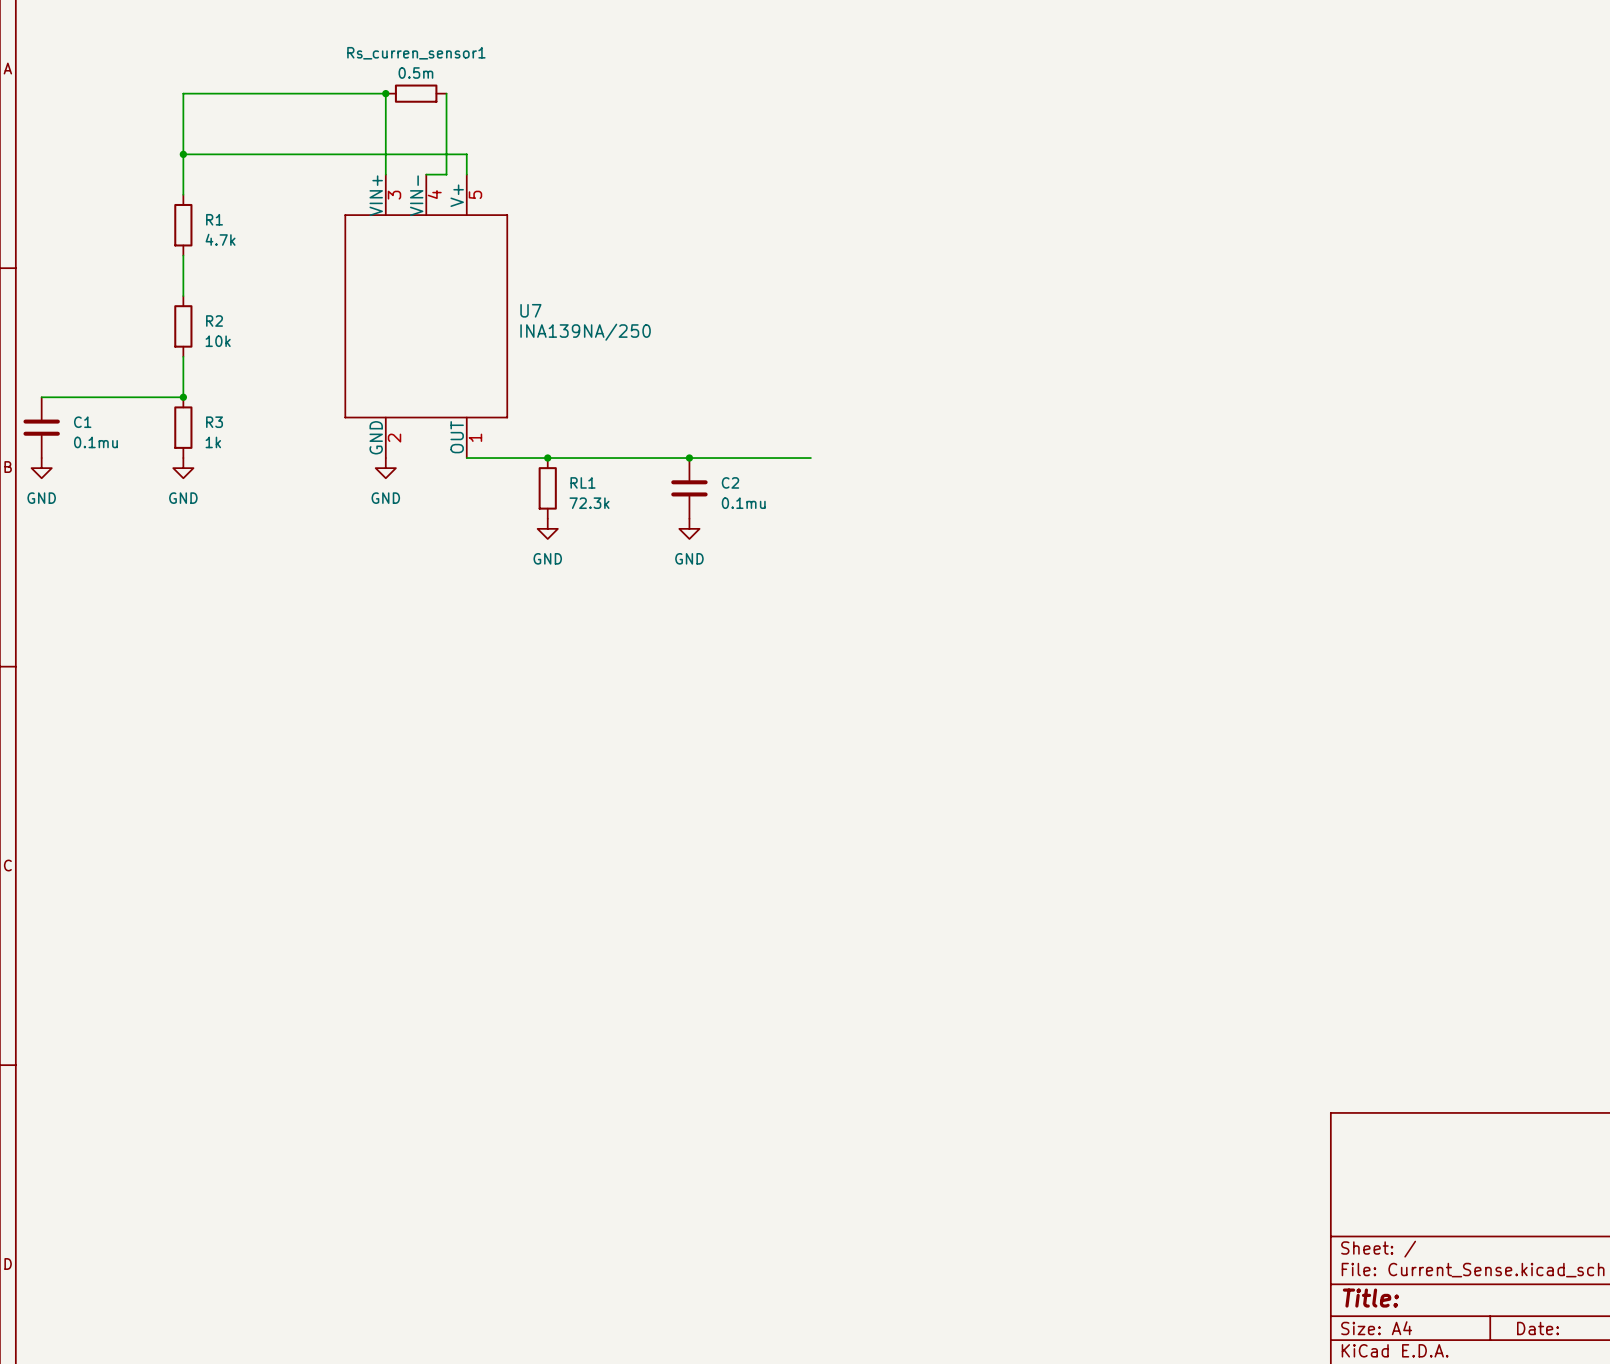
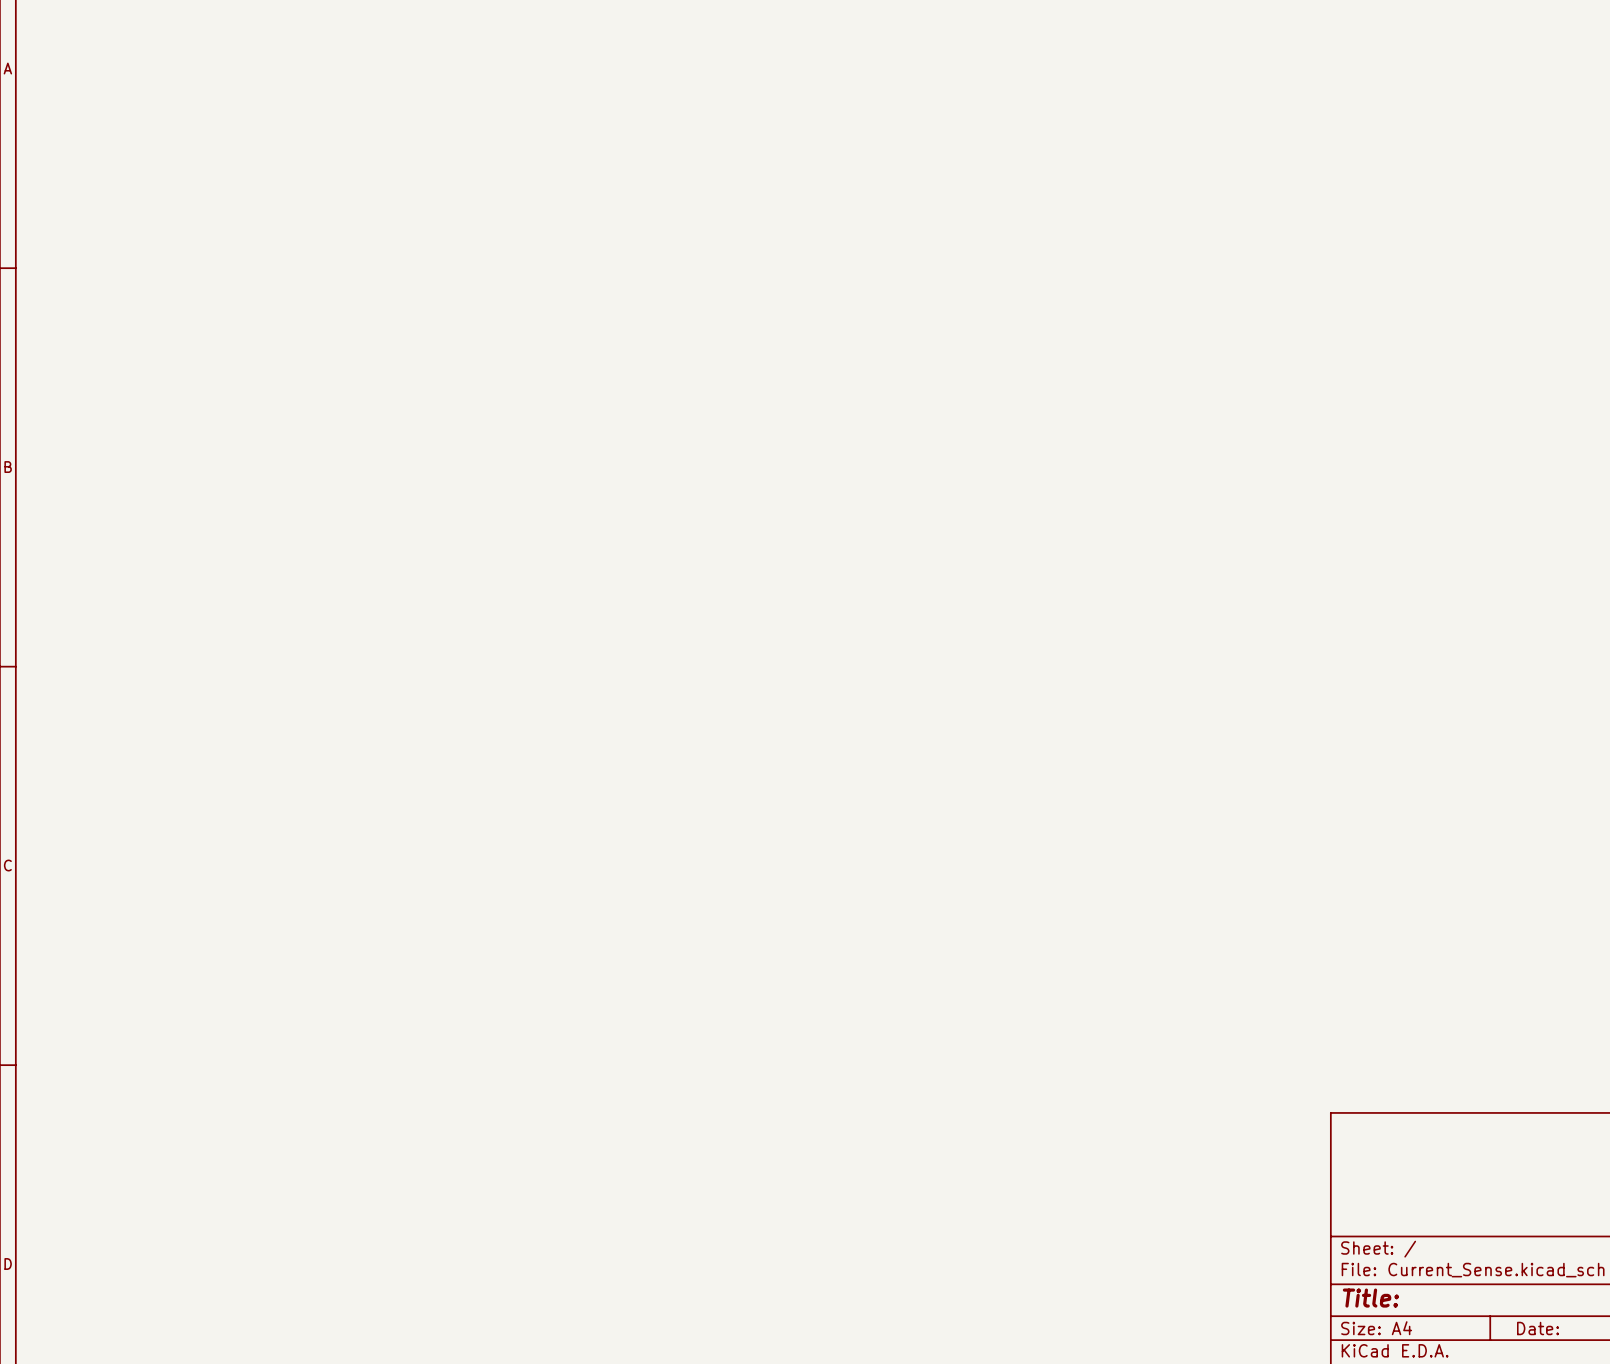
junction: (385, 93) -> none
Rs_curren_sensor1: 0.5m (416, 93) -> none
wire: (446, 93) (446, 174) (426, 174) -> none
wire: (183, 154) (466, 154) (466, 174) -> none
junction: (183, 154) -> none
wire: (385, 174) (385, 93) (183, 93) (183, 194) -> none
R1: 4.7k (183, 225) -> none
wire: (183, 255) (183, 296) -> none
U7: INA139NA/250 (426, 316) -> none
R2: 10k (183, 326) -> none
wire: (183, 356) (183, 397) (41, 397) -> none
junction: (183, 397) -> none
C1: 0.1mu (41, 427) -> none
R3: 1k (183, 427) -> none
wire: (466, 458) (810, 458) -> none
junction: (547, 458) -> none
junction: (689, 458) -> none
power symbol: GND (41, 468) -> none
power symbol: GND (183, 468) -> none
power symbol: GND (385, 468) -> none
RL1: 72.3k (547, 488) -> none
C2: 0.1mu (689, 488) -> none
power symbol: GND (547, 528) -> none
power symbol: GND (689, 528) -> none

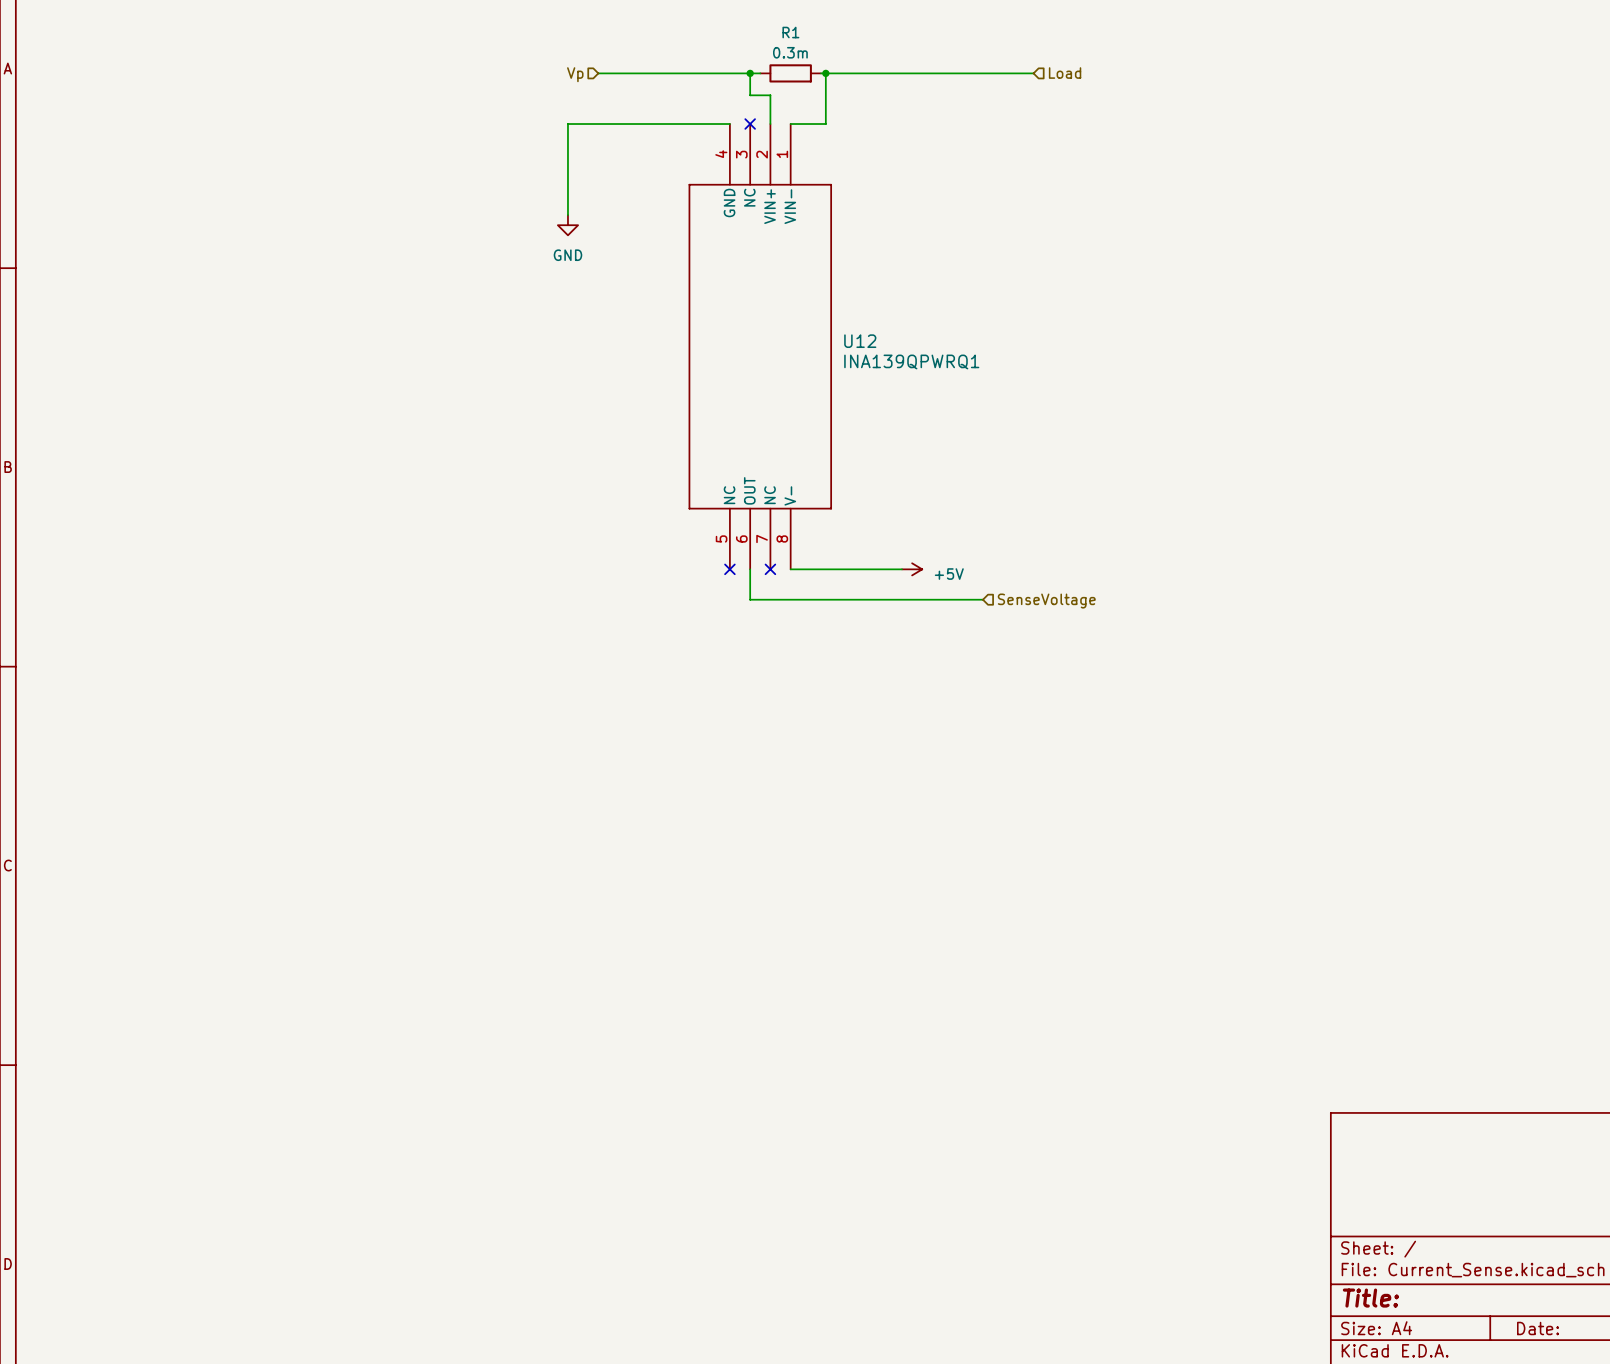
wire: none -> (598, 73) (760, 73)
wire: none -> (750, 73) (750, 95) (770, 95) (770, 124)
junction: none -> (750, 73)
R1: none -> 0.3m (790, 73)
wire: none -> (821, 73) (1033, 73)
wire: none -> (825, 73) (825, 124) (790, 124)
junction: none -> (825, 73)
hierarchical label: none -> Load (1065, 73)
hierarchical label: none -> Vp (575, 74)
wire: none -> (729, 124) (567, 124) (567, 215)
no-connect mark: none -> (750, 124)
power symbol: none -> GND (567, 225)
U12: none -> INA139QPWRQ1 (760, 346)
no-connect mark: none -> (729, 569)
wire: none -> (750, 569) (750, 599) (982, 599)
no-connect mark: none -> (770, 569)
wire: none -> (790, 569) (901, 569)
power symbol: none -> +5V (912, 569)
hierarchical label: none -> SenseVoltage (1046, 601)

